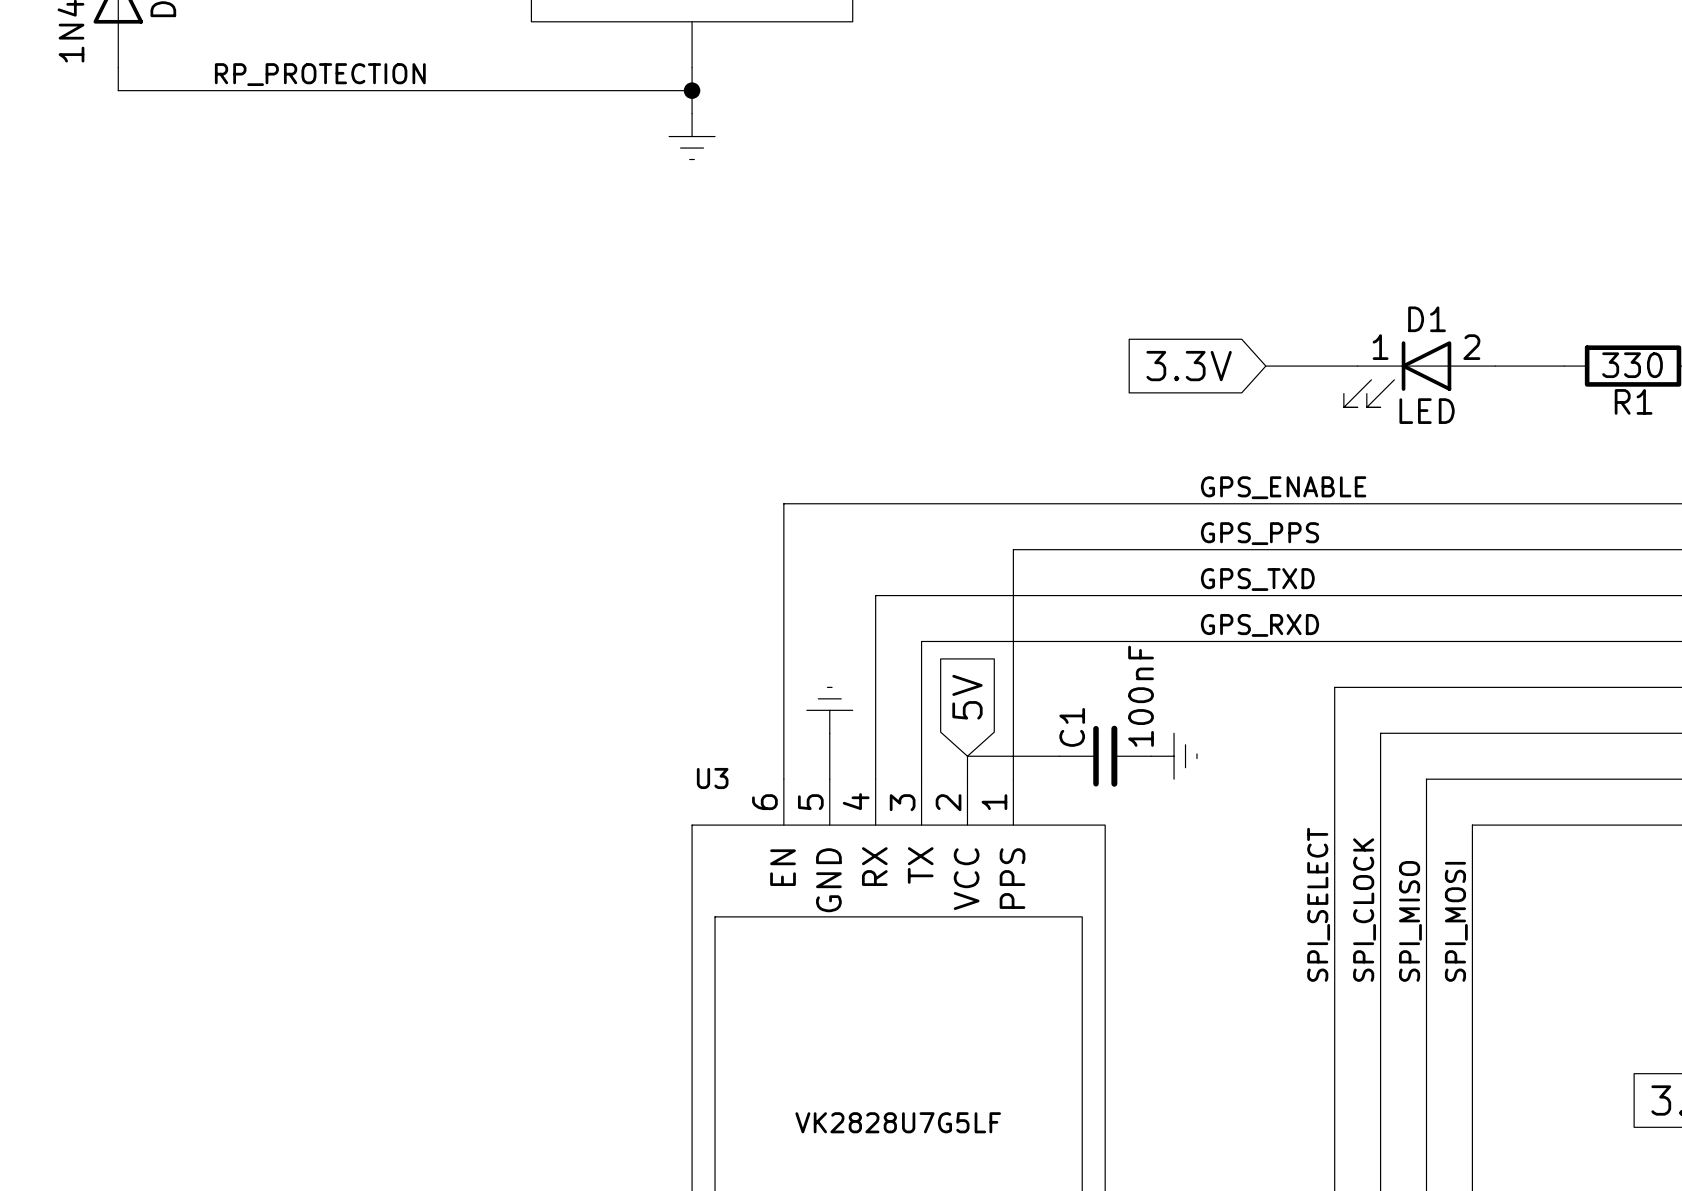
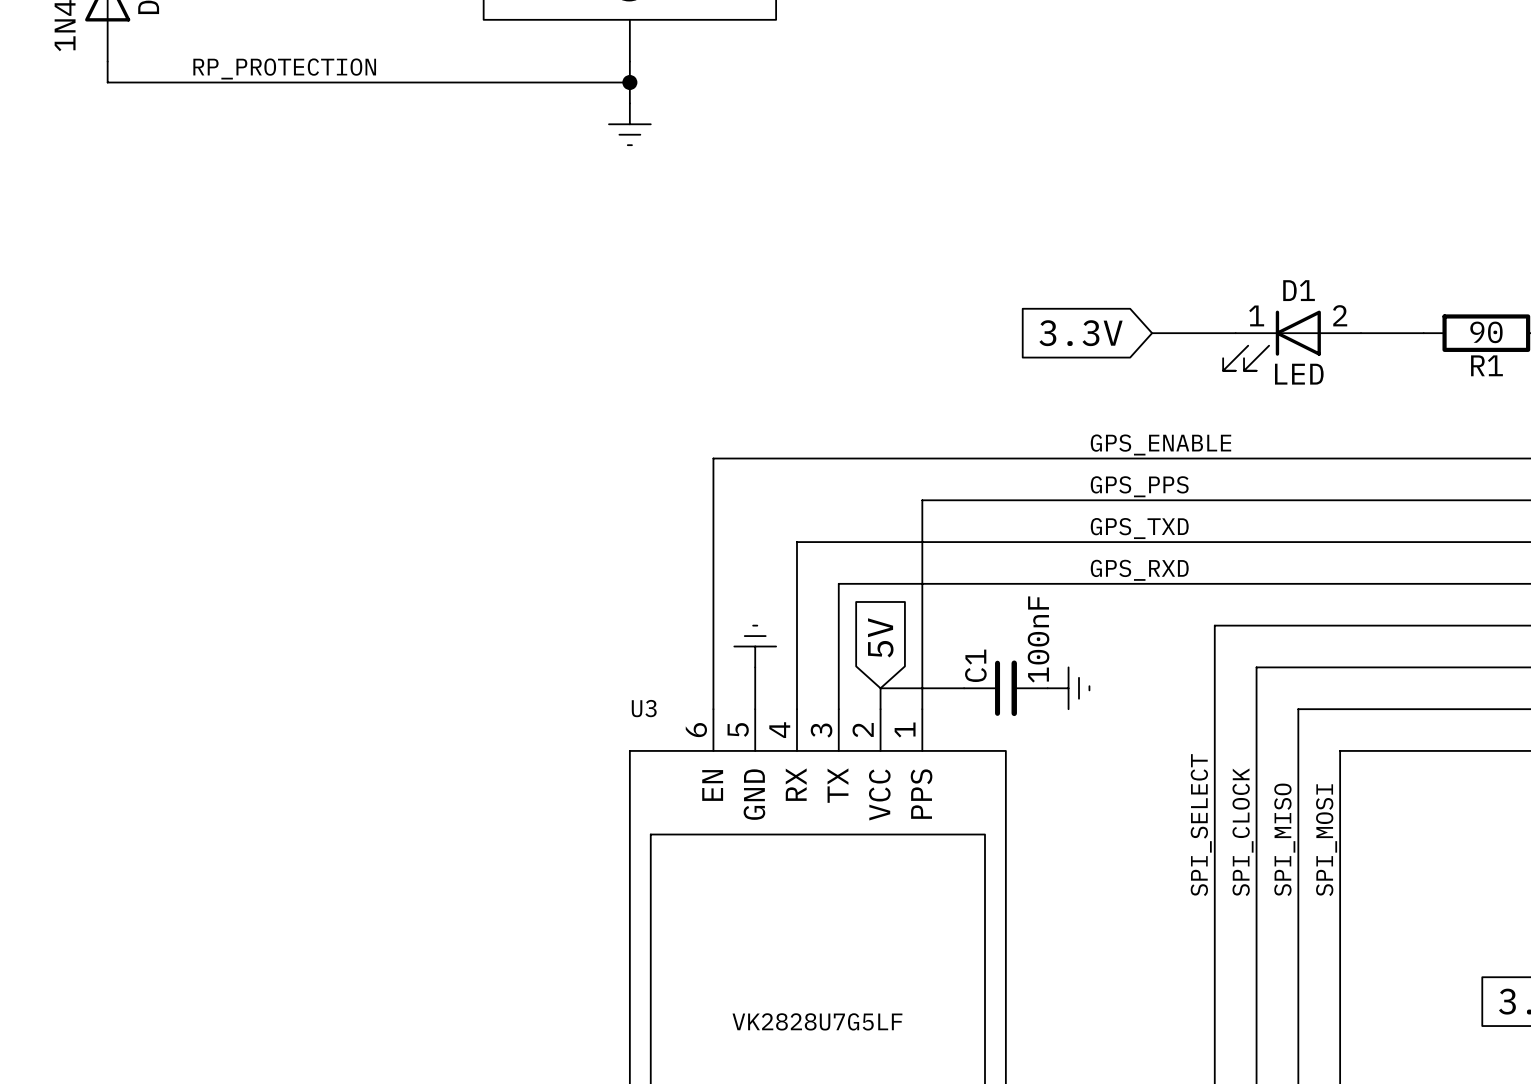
R1 value: 330 (1632, 365) -> 90 (1486, 332)

